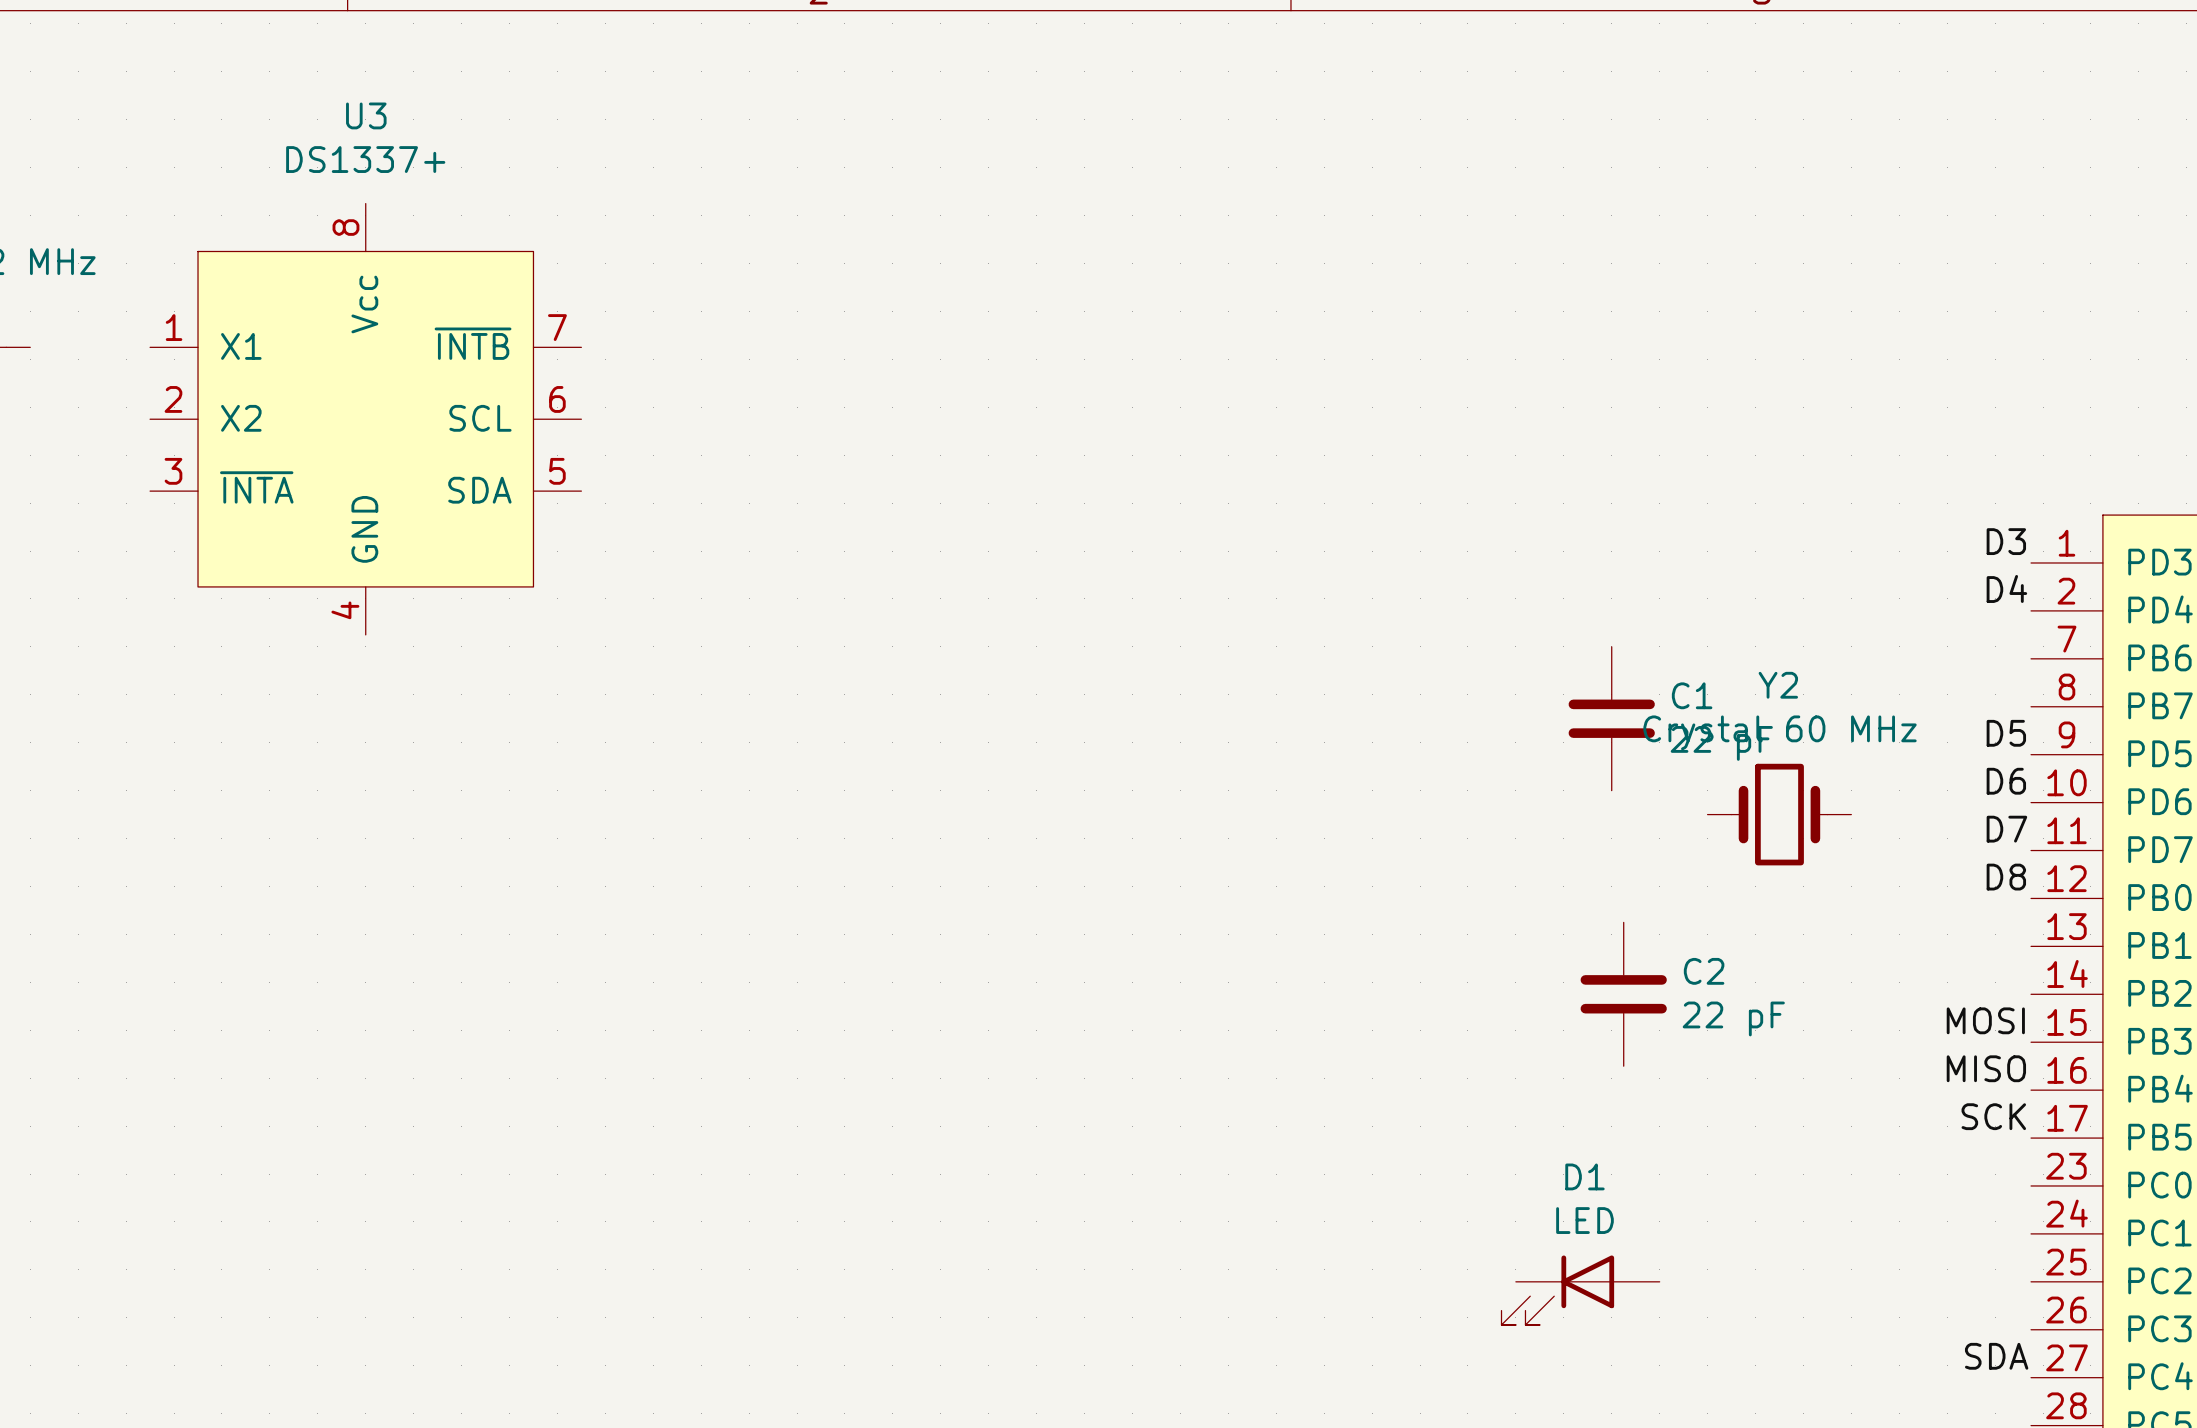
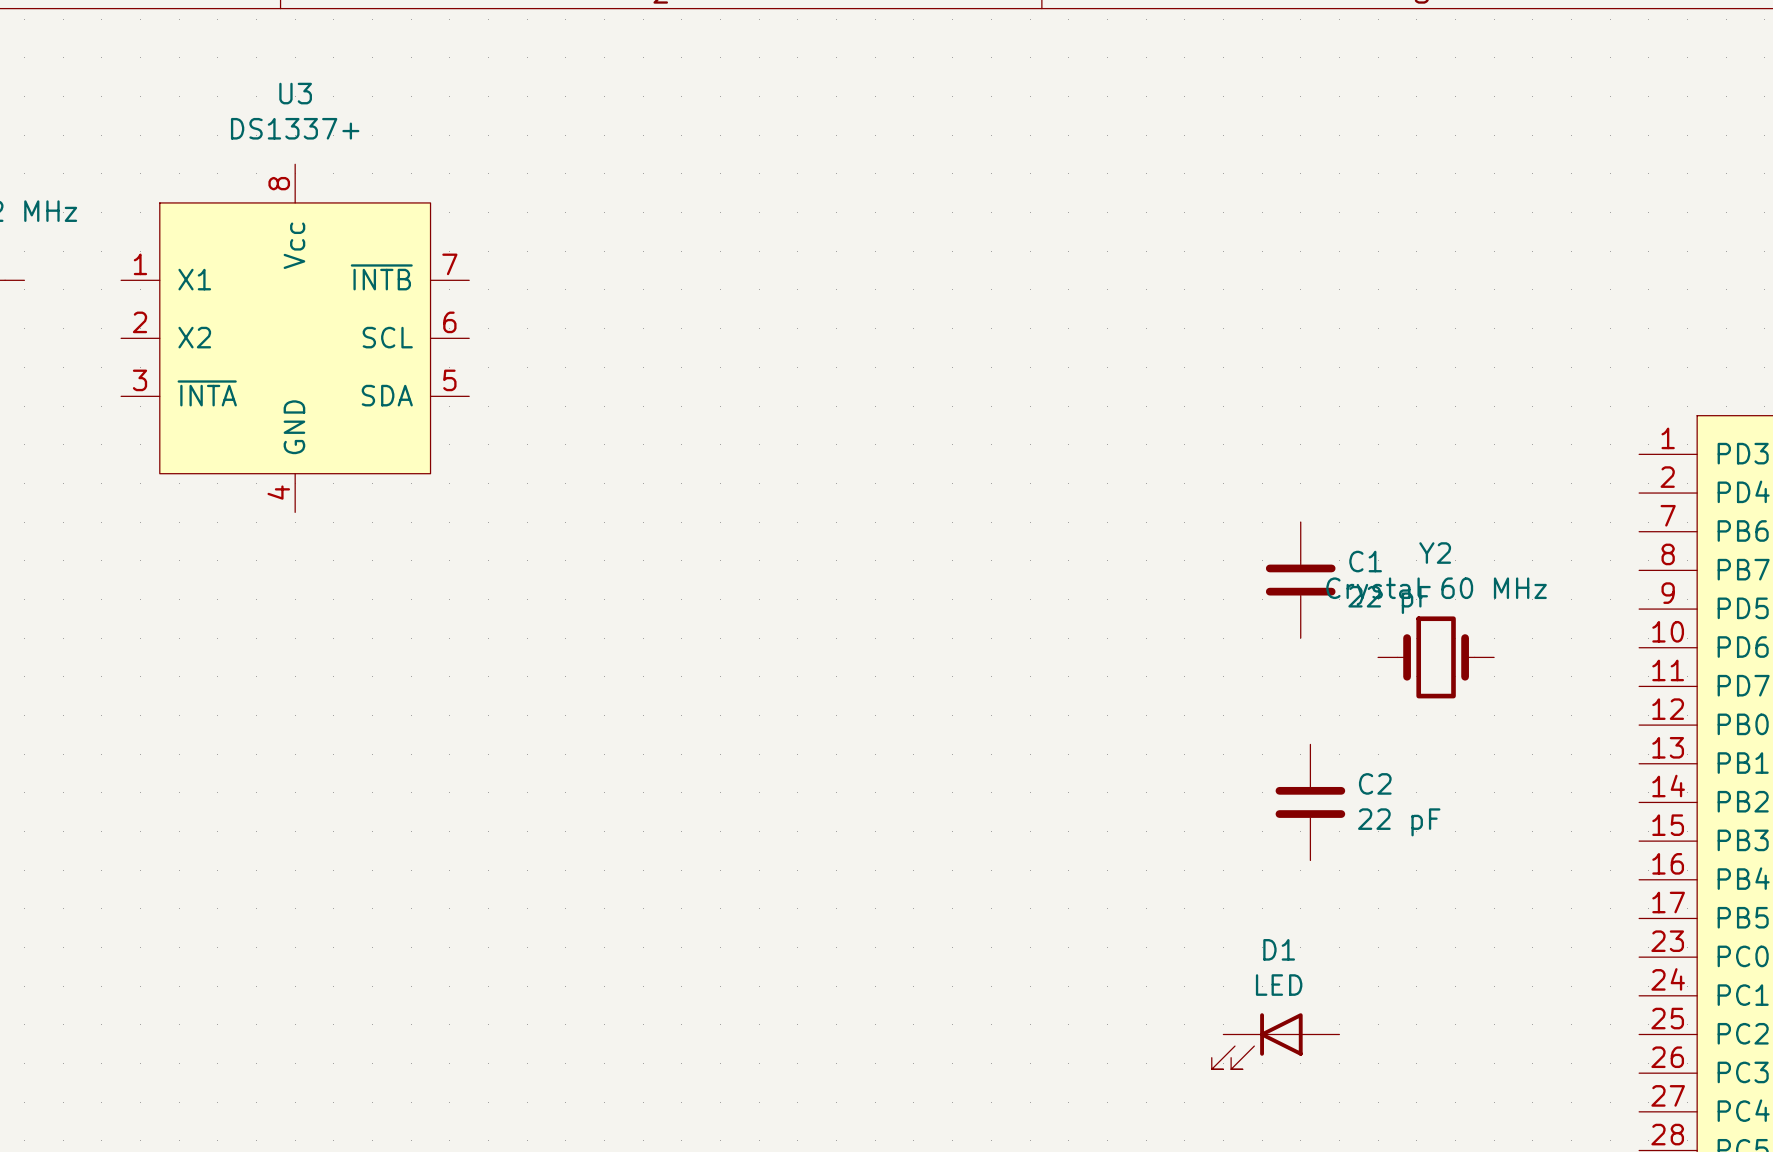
label: D3 (2006, 541) -> none
label: D4 (2006, 588) -> none
label: D5 (2006, 733) -> none
label: D6 (2006, 781) -> none
label: D7 (2006, 829) -> none
label: D8 (2006, 877) -> none
label: MOSI (1985, 1020) -> none
label: MISO (1986, 1068) -> none
label: SCK (1993, 1116) -> none
label: SDA (1996, 1356) -> none

